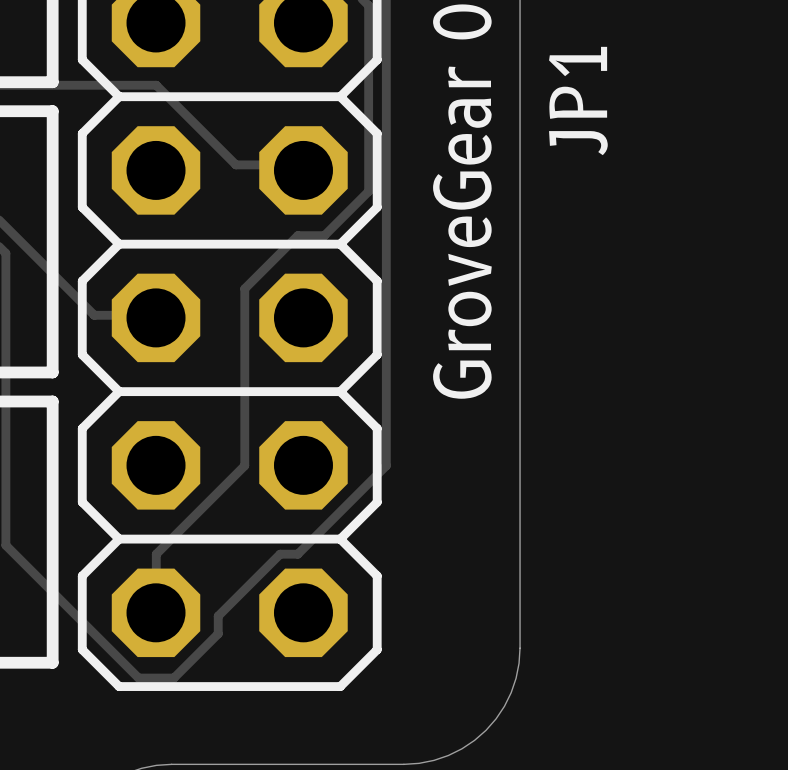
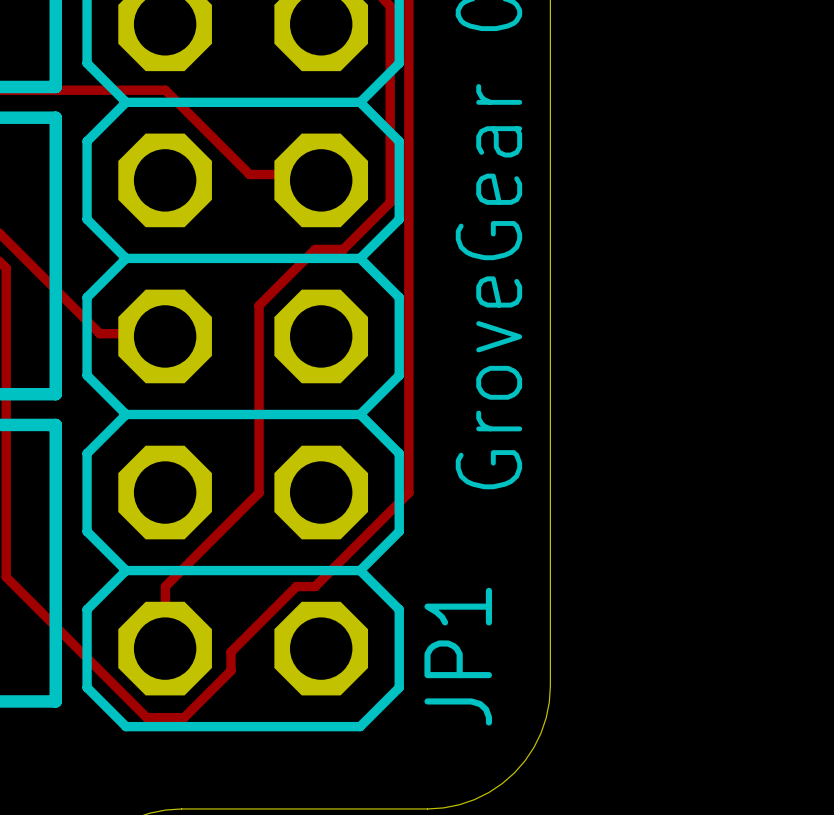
JP1 name position: JP1 (578, 101) -> JP1 (458, 656)

